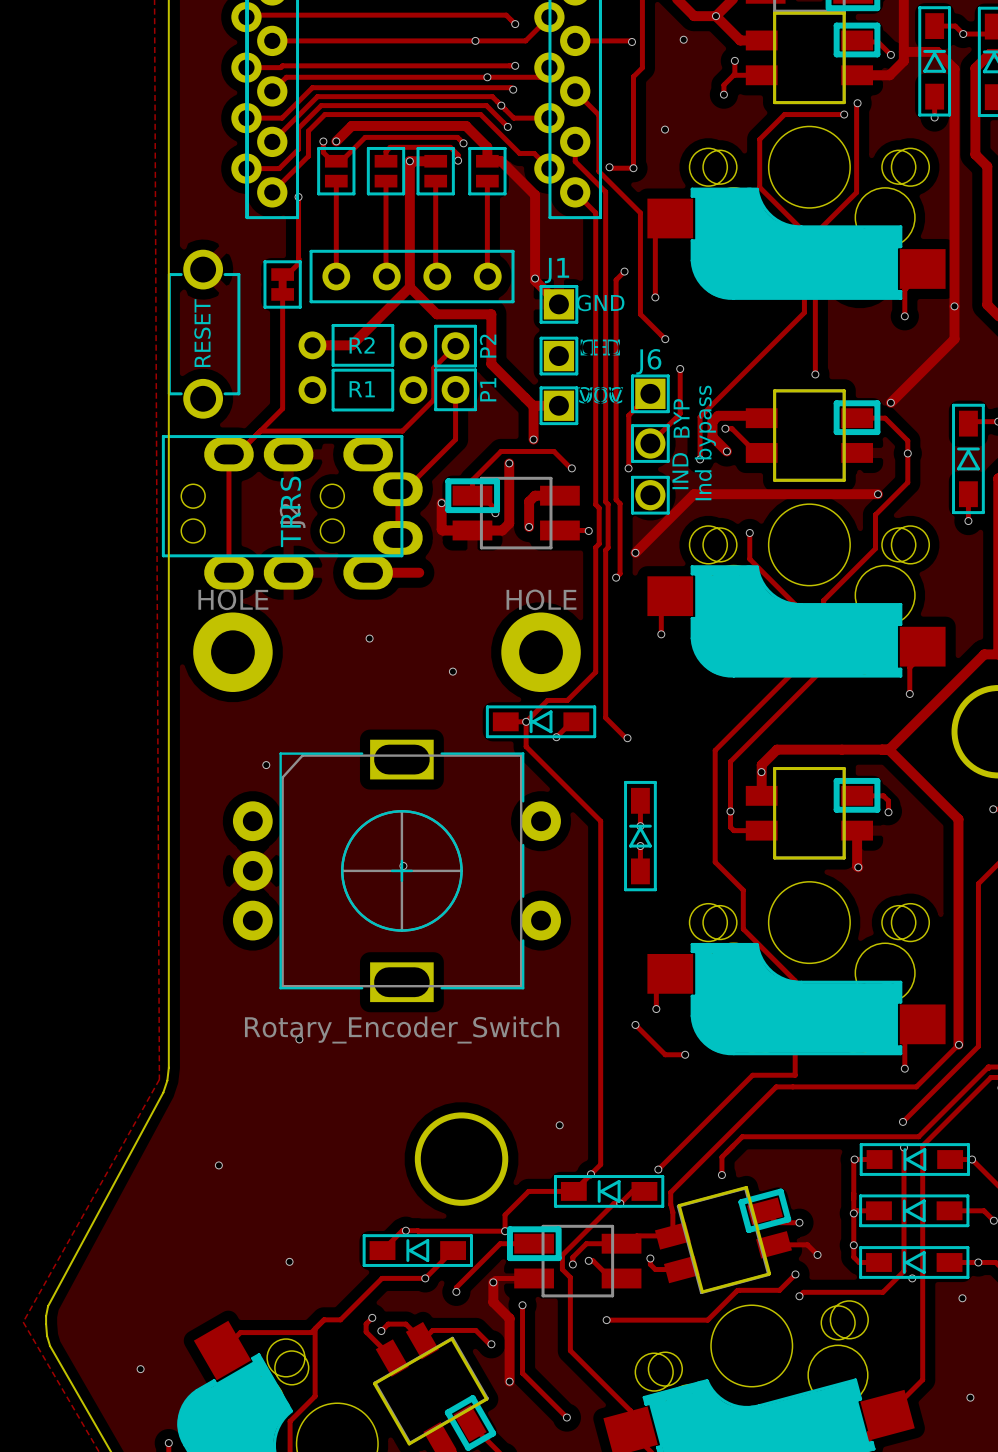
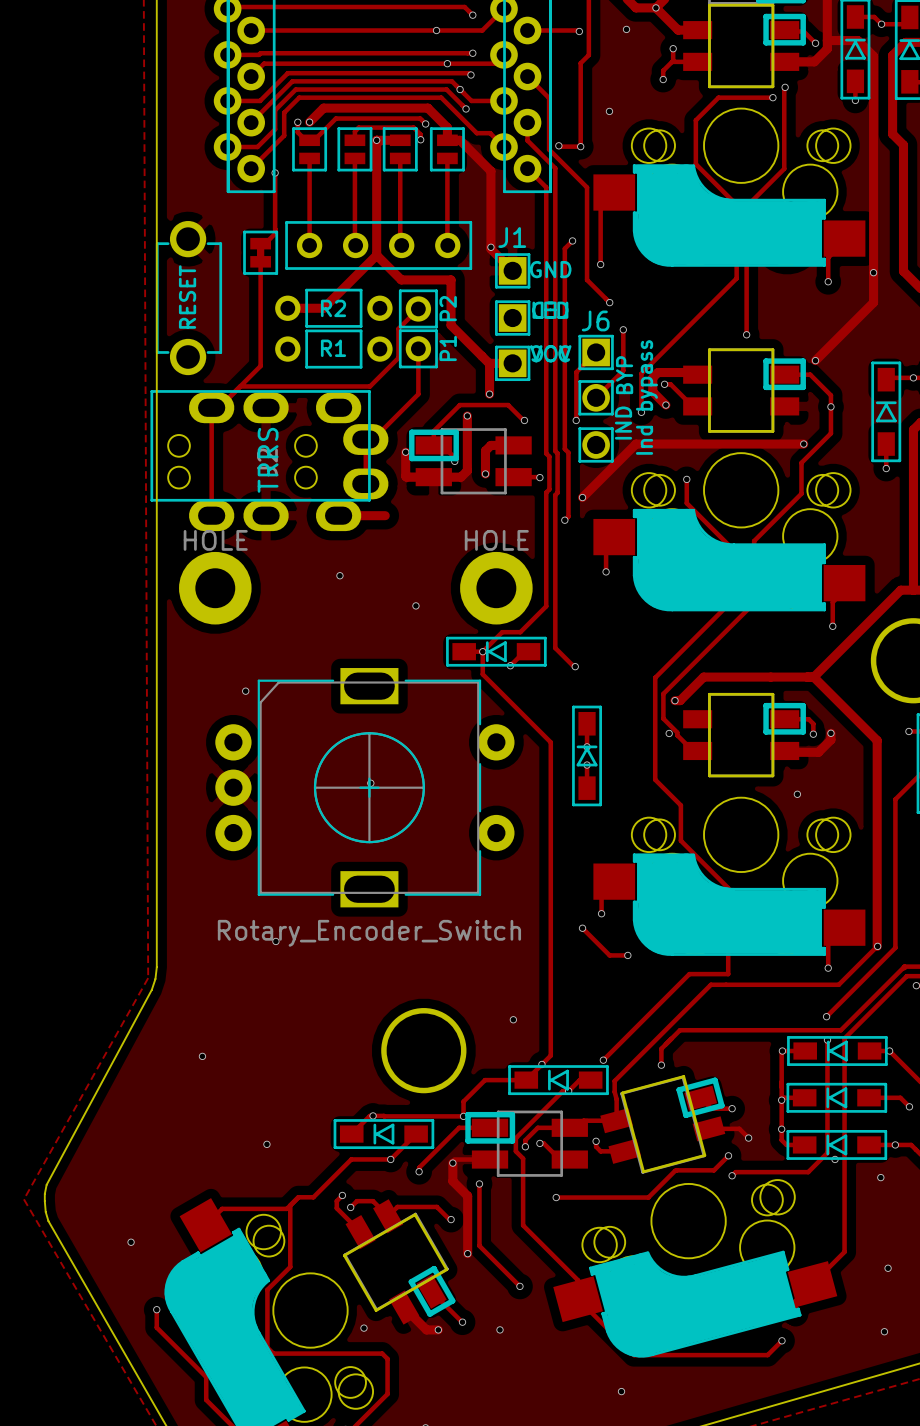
track: (777, 749) (761, 764) (761, 795) -> (711, 677) (703, 677) (680, 700) (674, 700)
track: (730, 761) (730, 827) (733, 830) (756, 830) -> (669, 688) (663, 693) (663, 718) (692, 750)
via position: (761, 772) -> (674, 700)
track: none -> (830, 733) (830, 739) (818, 752) (786, 752)
via: none -> (830, 733)
track: (857, 830) (858, 867) -> none
via position: (858, 867) -> (797, 794)

